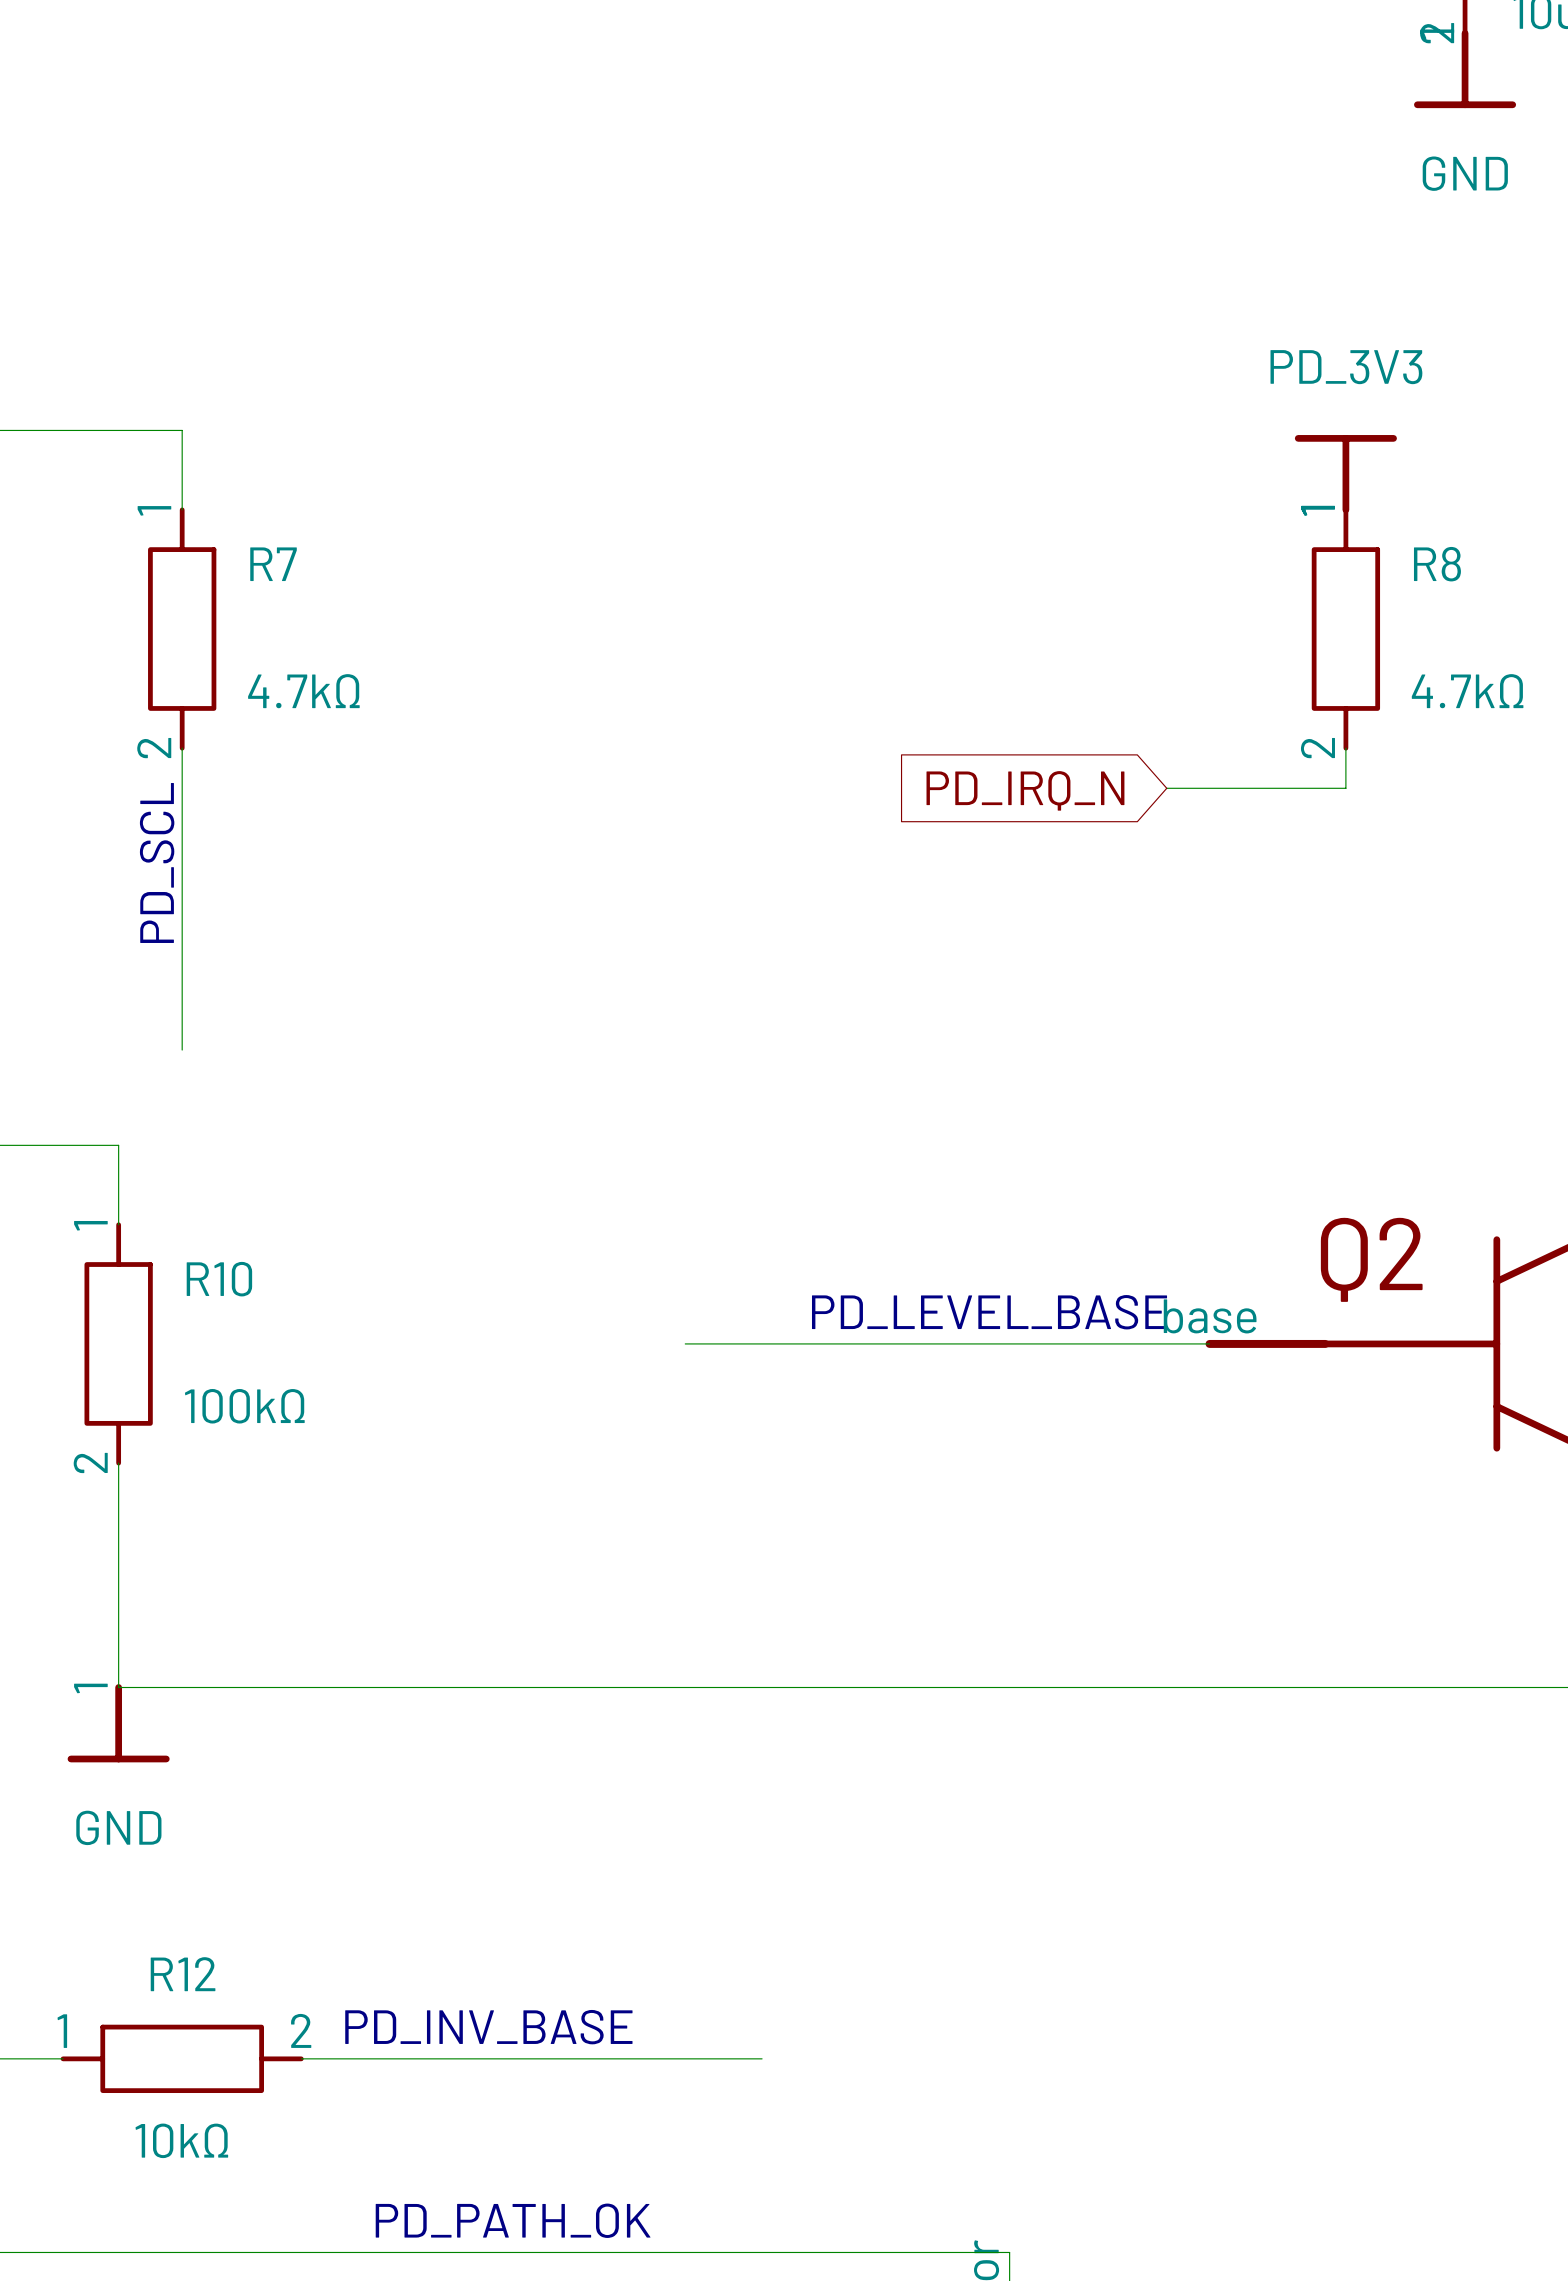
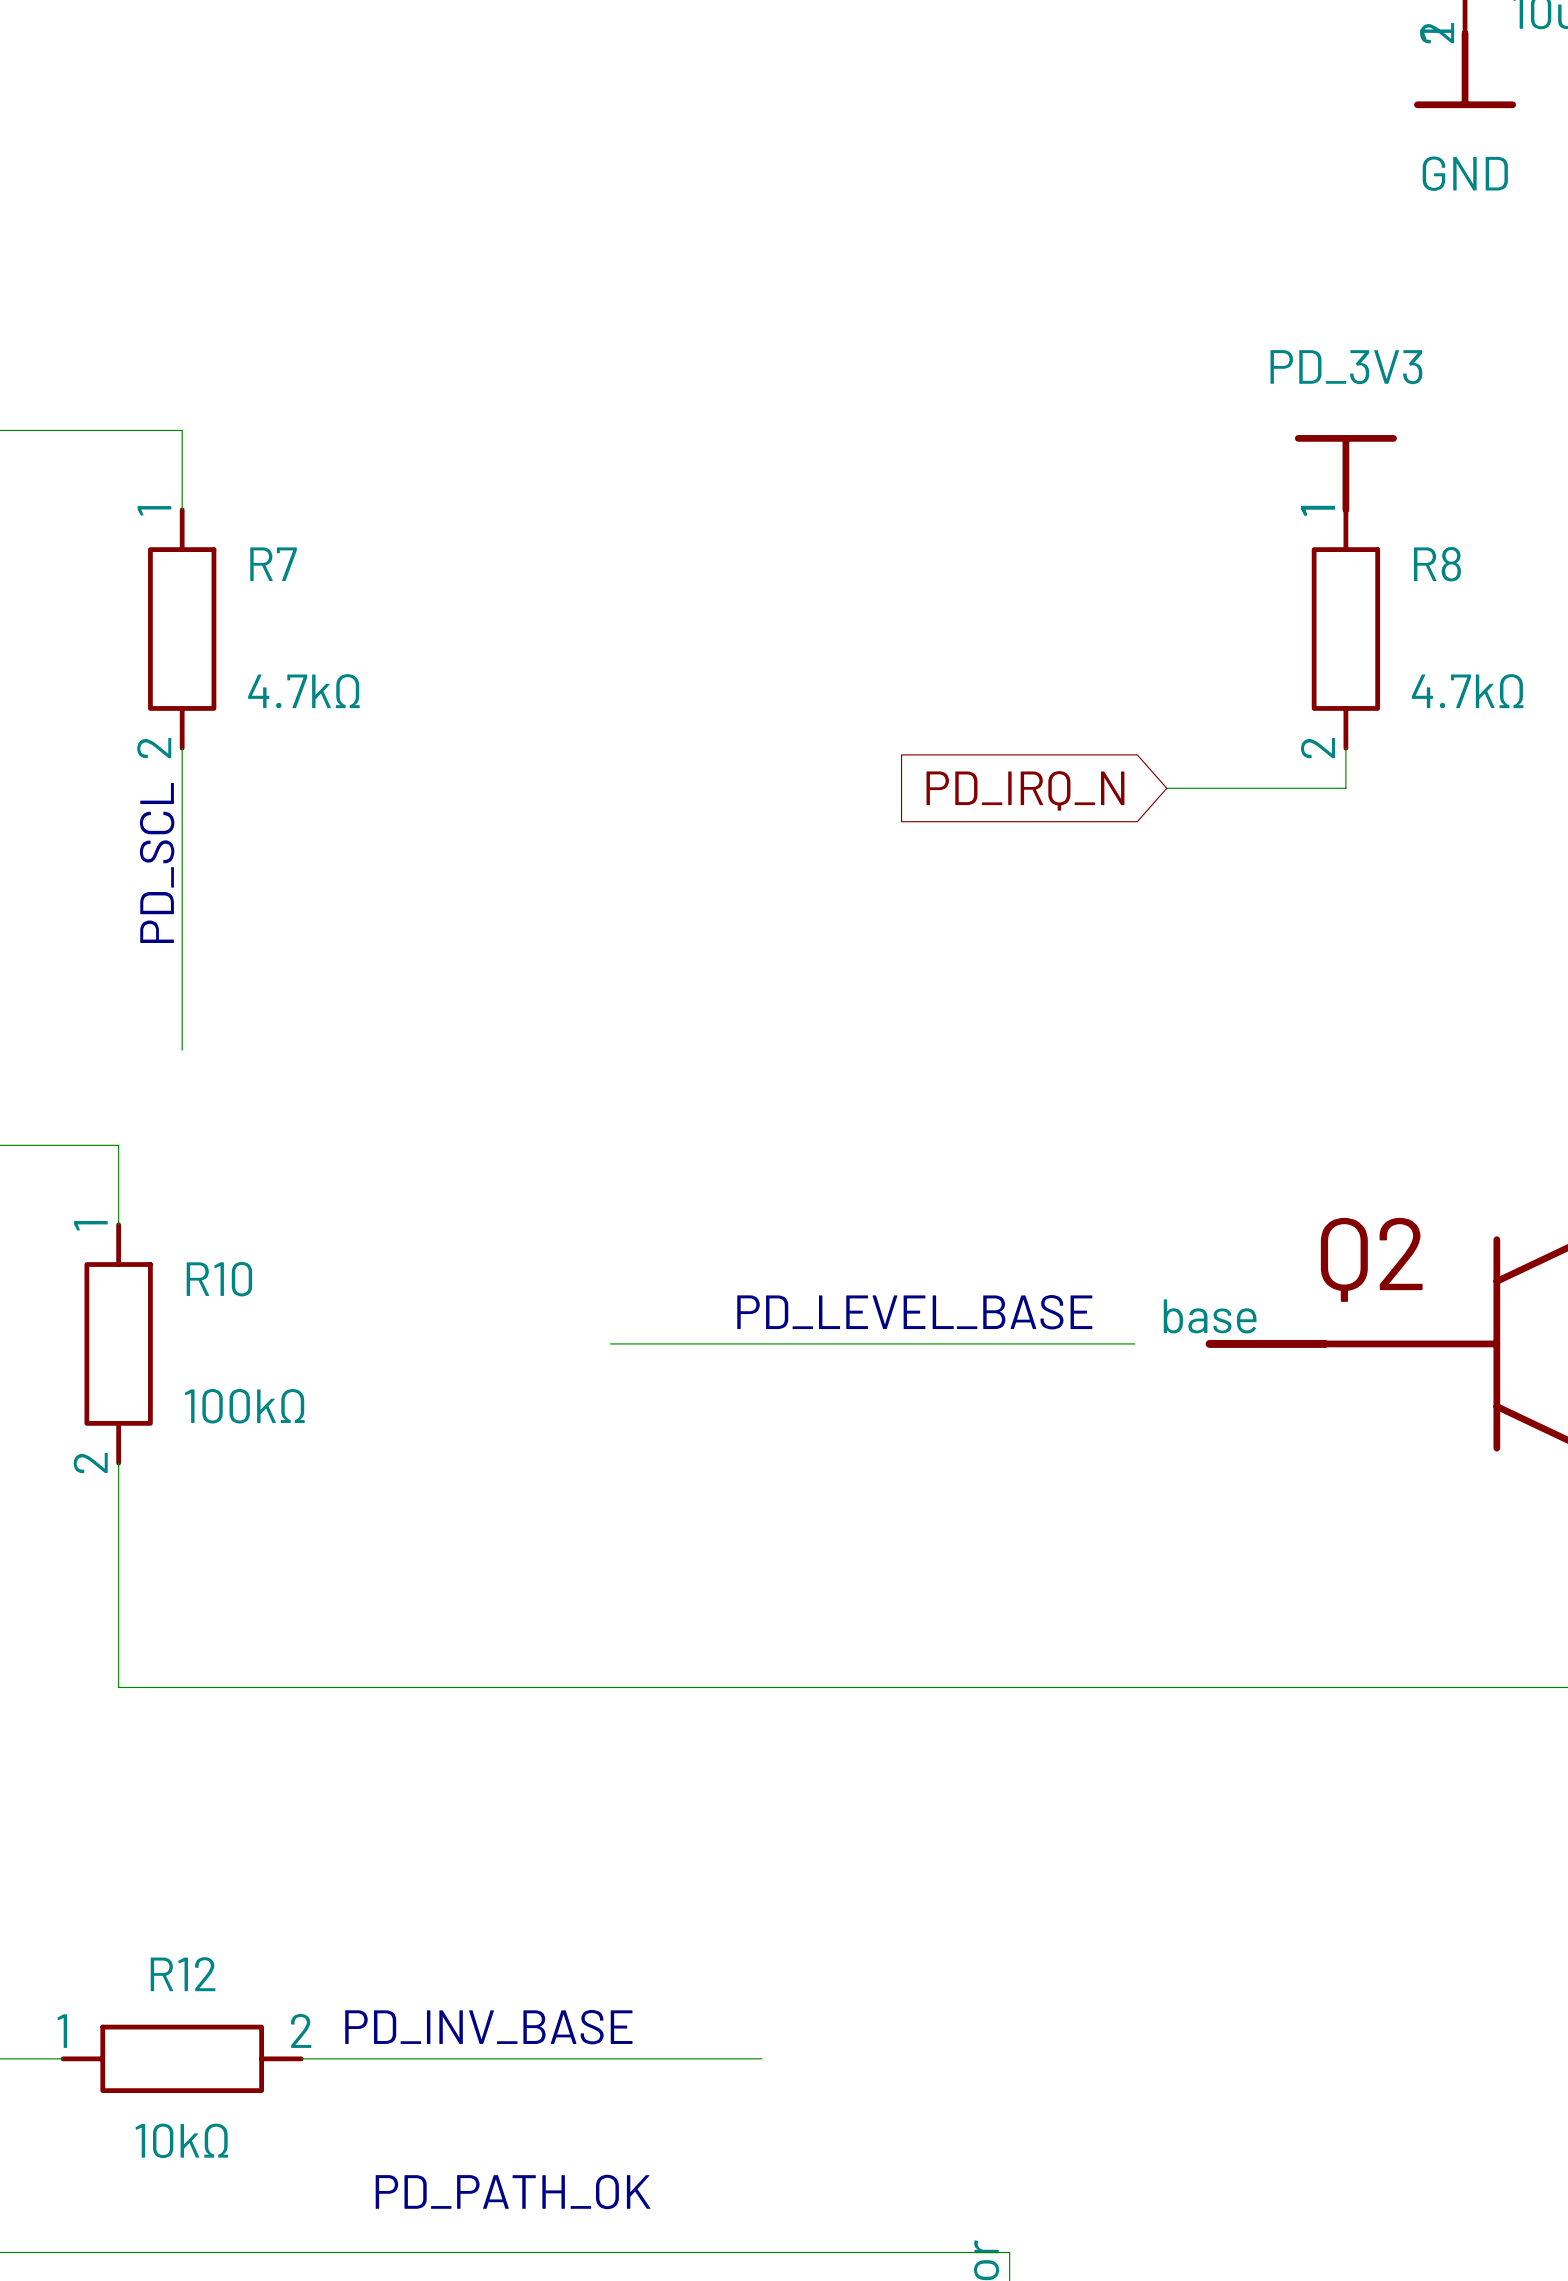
text position: PD_LEVEL_BASE (989, 1312) -> PD_LEVEL_BASE (914, 1312)
wire: (1134, 1343) (1209, 1343) -> (610, 1343) (685, 1343)
GND: (118, 1723) -> none
text position: PD_PATH_OK (513, 2220) -> PD_PATH_OK (513, 2191)

